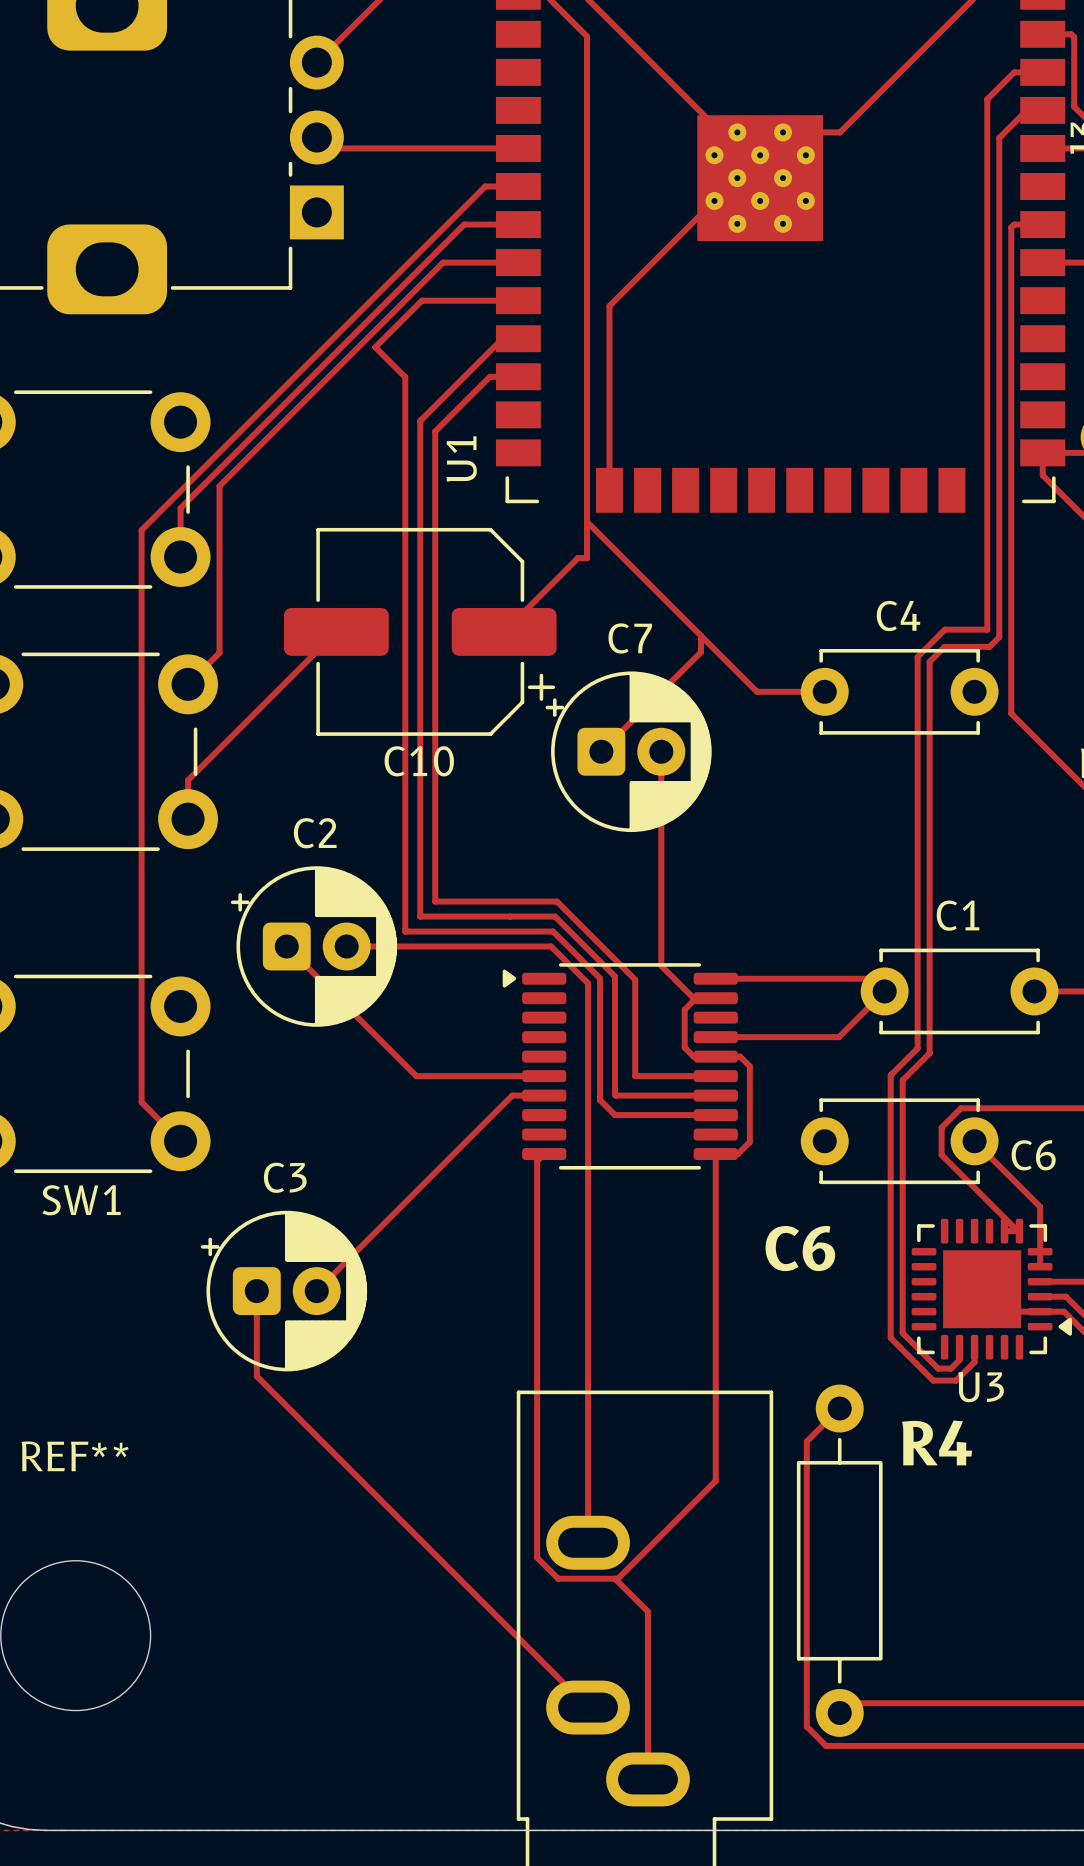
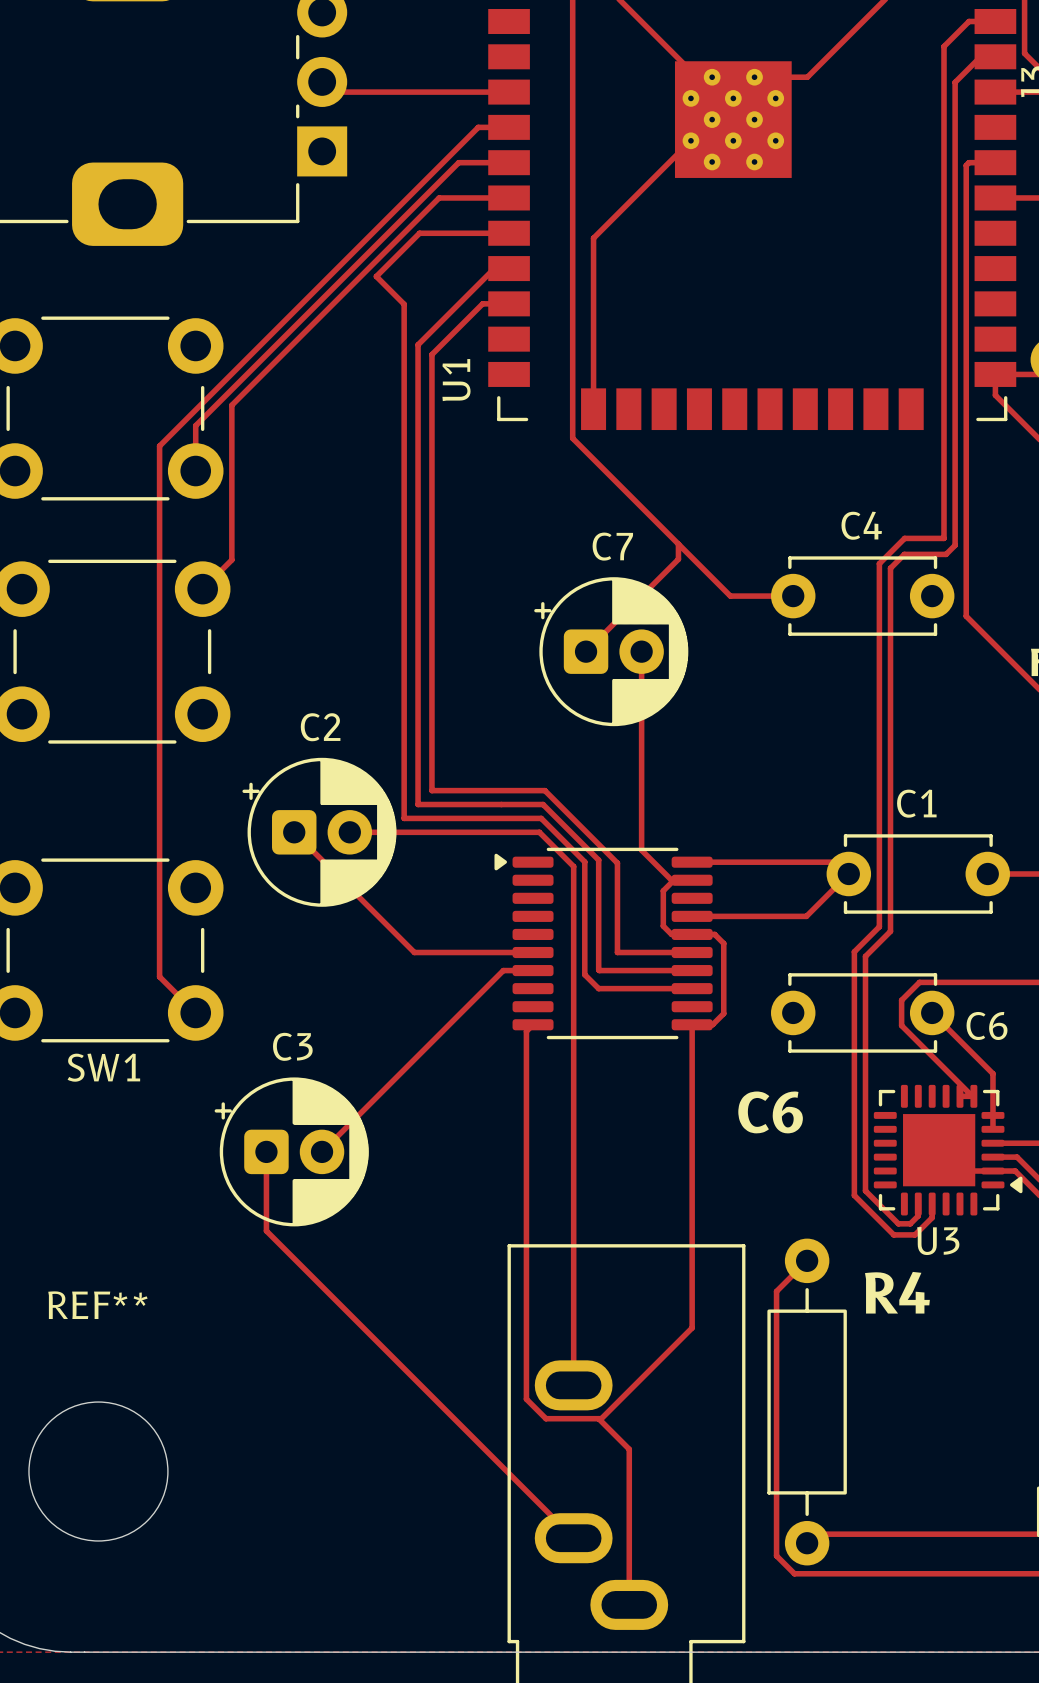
track: (587, 521) (587, 558) (578, 558) (504, 631) -> none
track: (336, 631) (188, 780) (188, 819) -> none
C10: (420, 631) -> none

